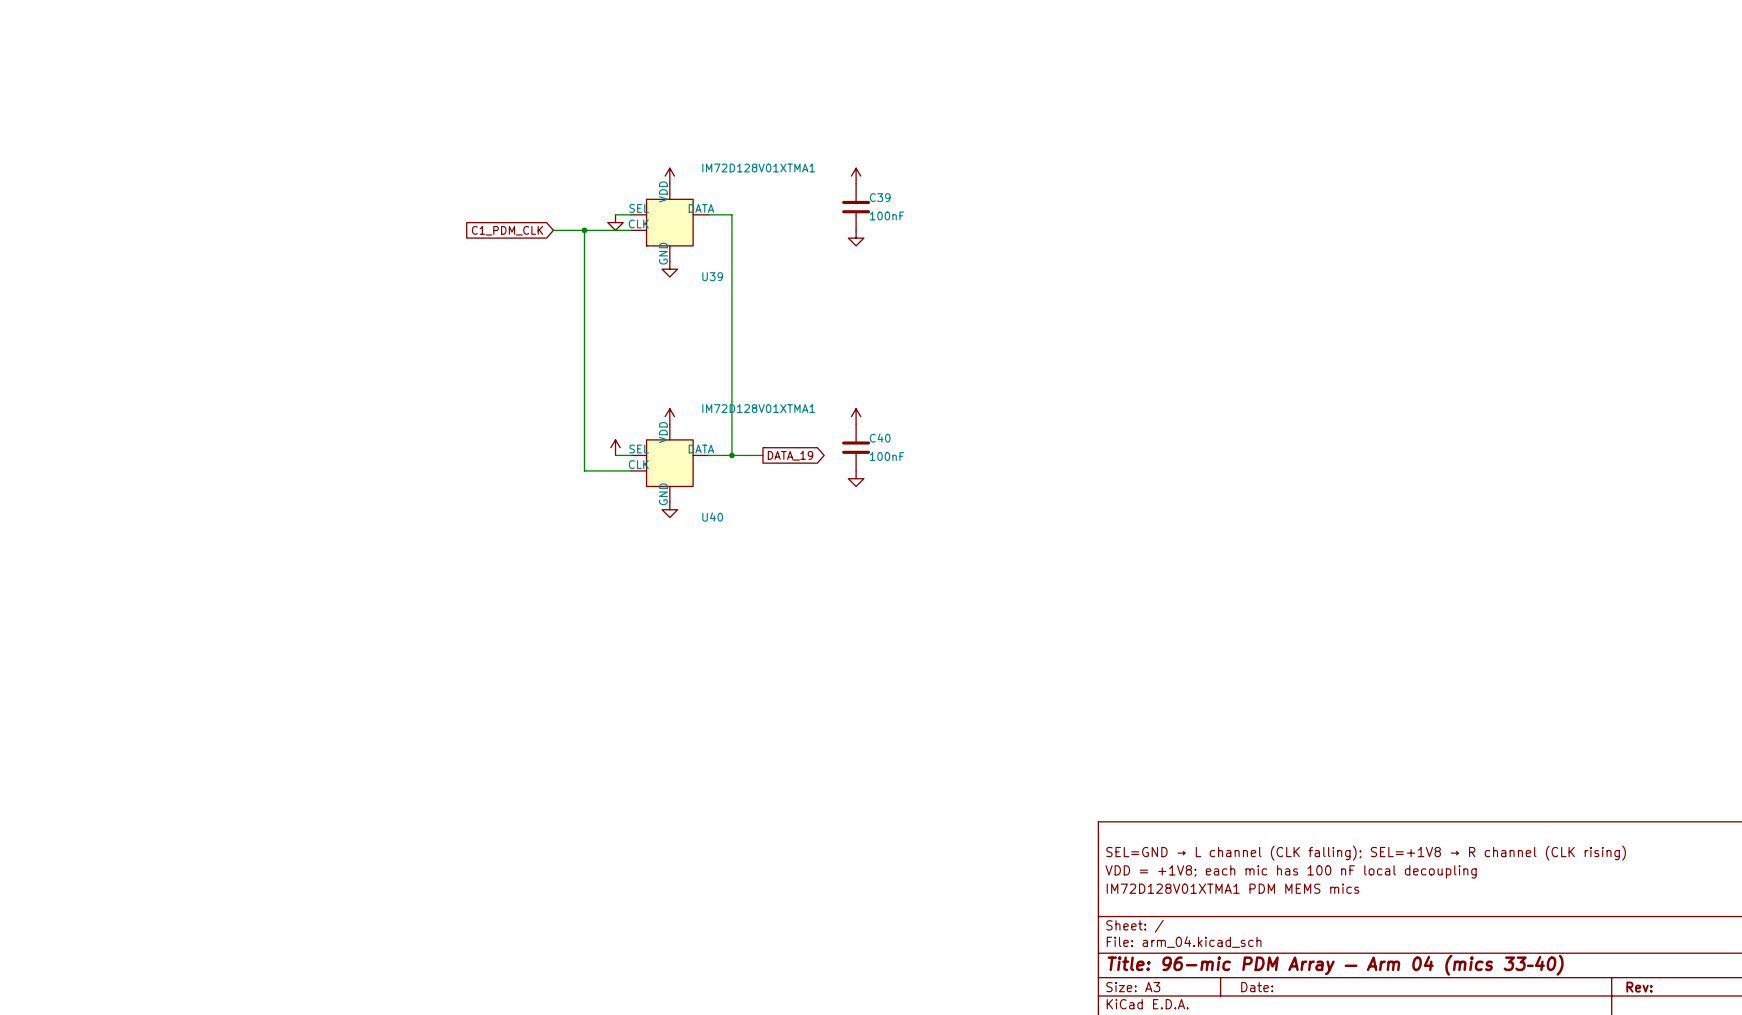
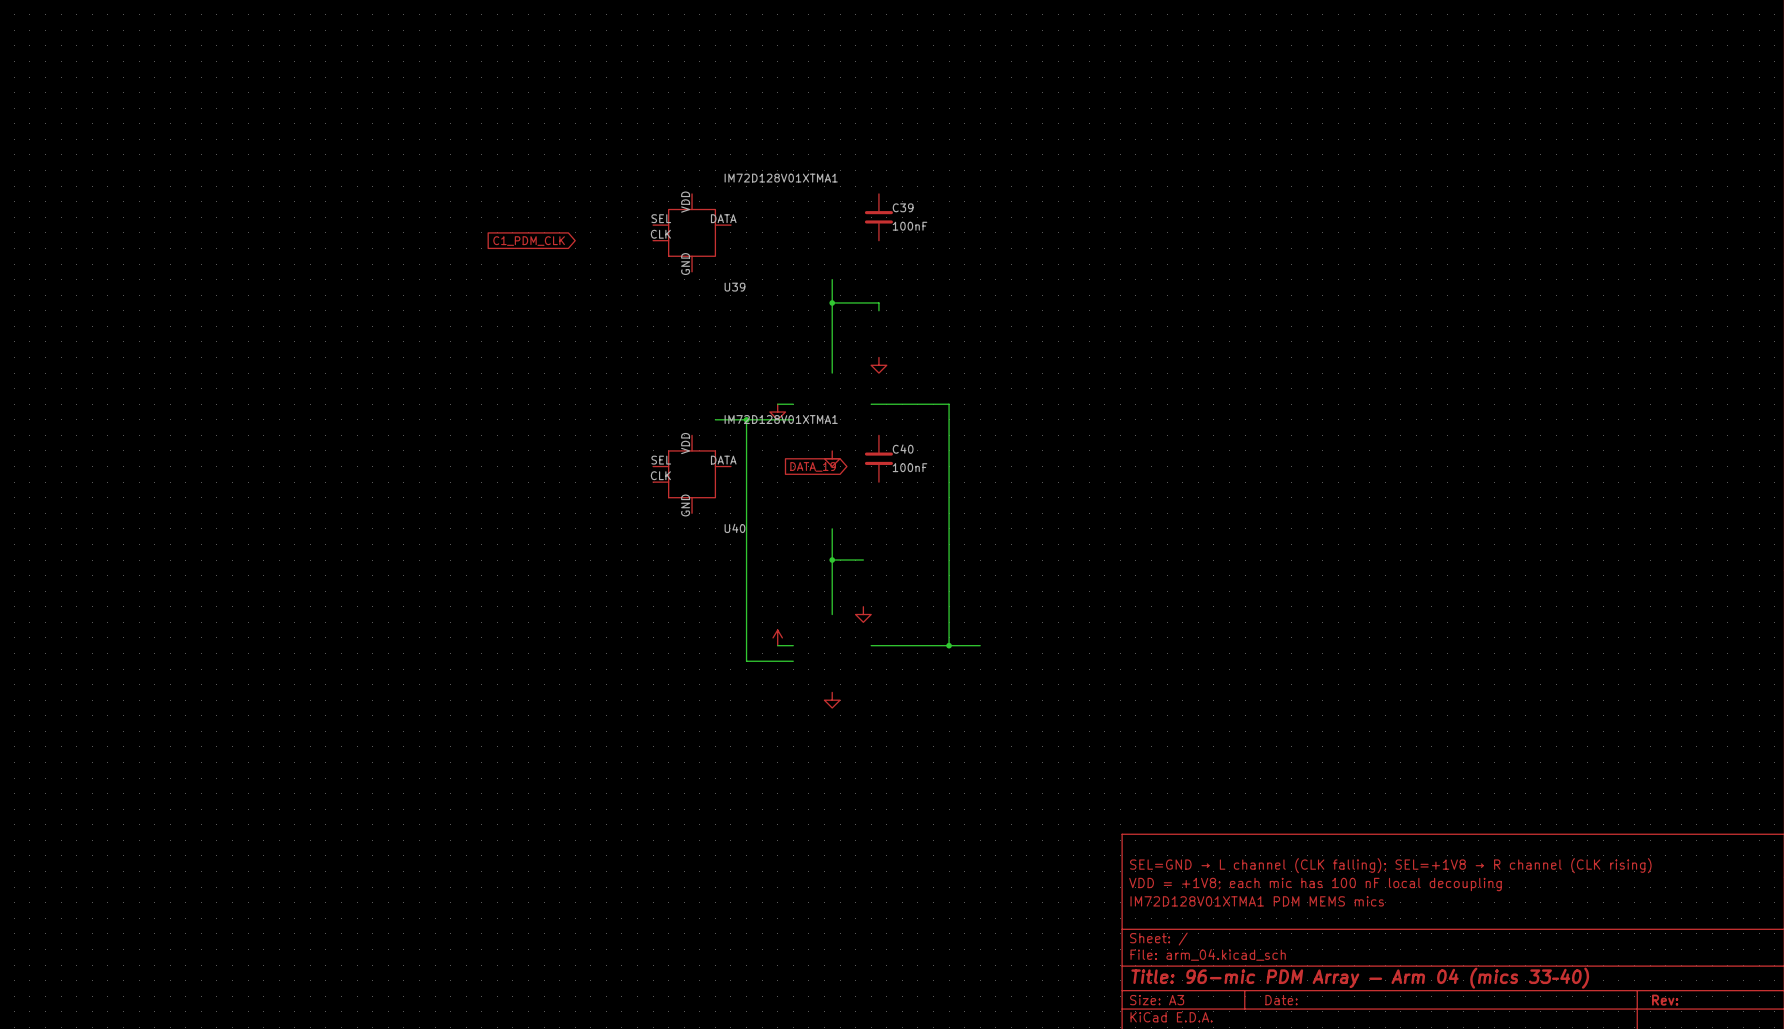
power symbol: (669, 176) -> none
power symbol: (856, 176) -> none
wire: (615, 214) (631, 214) -> none
wire: (708, 214) (731, 214) (731, 455) -> none
power symbol: (615, 222) -> none
wire: (553, 230) (631, 230) -> none
wire: (584, 230) (584, 470) (631, 470) -> none
junction: (584, 230) -> none
power symbol: (856, 238) -> none
power symbol: (669, 269) -> none
wire: none -> (832, 279) (832, 373)
wire: none -> (832, 302) (878, 302) (878, 310)
junction: none -> (832, 302)
power symbol: none -> (878, 365)
wire: none -> (777, 404) (793, 404)
wire: none -> (871, 404) (949, 404) (949, 645)
power symbol: none -> (777, 412)
wire: none -> (715, 419) (793, 419)
wire: none -> (746, 419) (746, 661) (793, 661)
junction: none -> (746, 419)
power symbol: (669, 416) -> none
power symbol: (856, 416) -> none
power symbol: (615, 447) -> none
wire: (615, 455) (631, 455) -> none
wire: (708, 455) (762, 455) -> none
junction: (731, 455) -> none
power symbol position: (856, 478) -> (832, 458)
power symbol: (669, 509) -> none
wire: none -> (832, 528) (832, 614)
wire: none -> (832, 560) (863, 560)
junction: none -> (832, 560)
power symbol: none -> (863, 614)
power symbol: none -> (777, 637)
wire: none -> (777, 645) (793, 645)
wire: none -> (871, 645) (980, 645)
junction: none -> (949, 645)
power symbol: none -> (832, 700)

